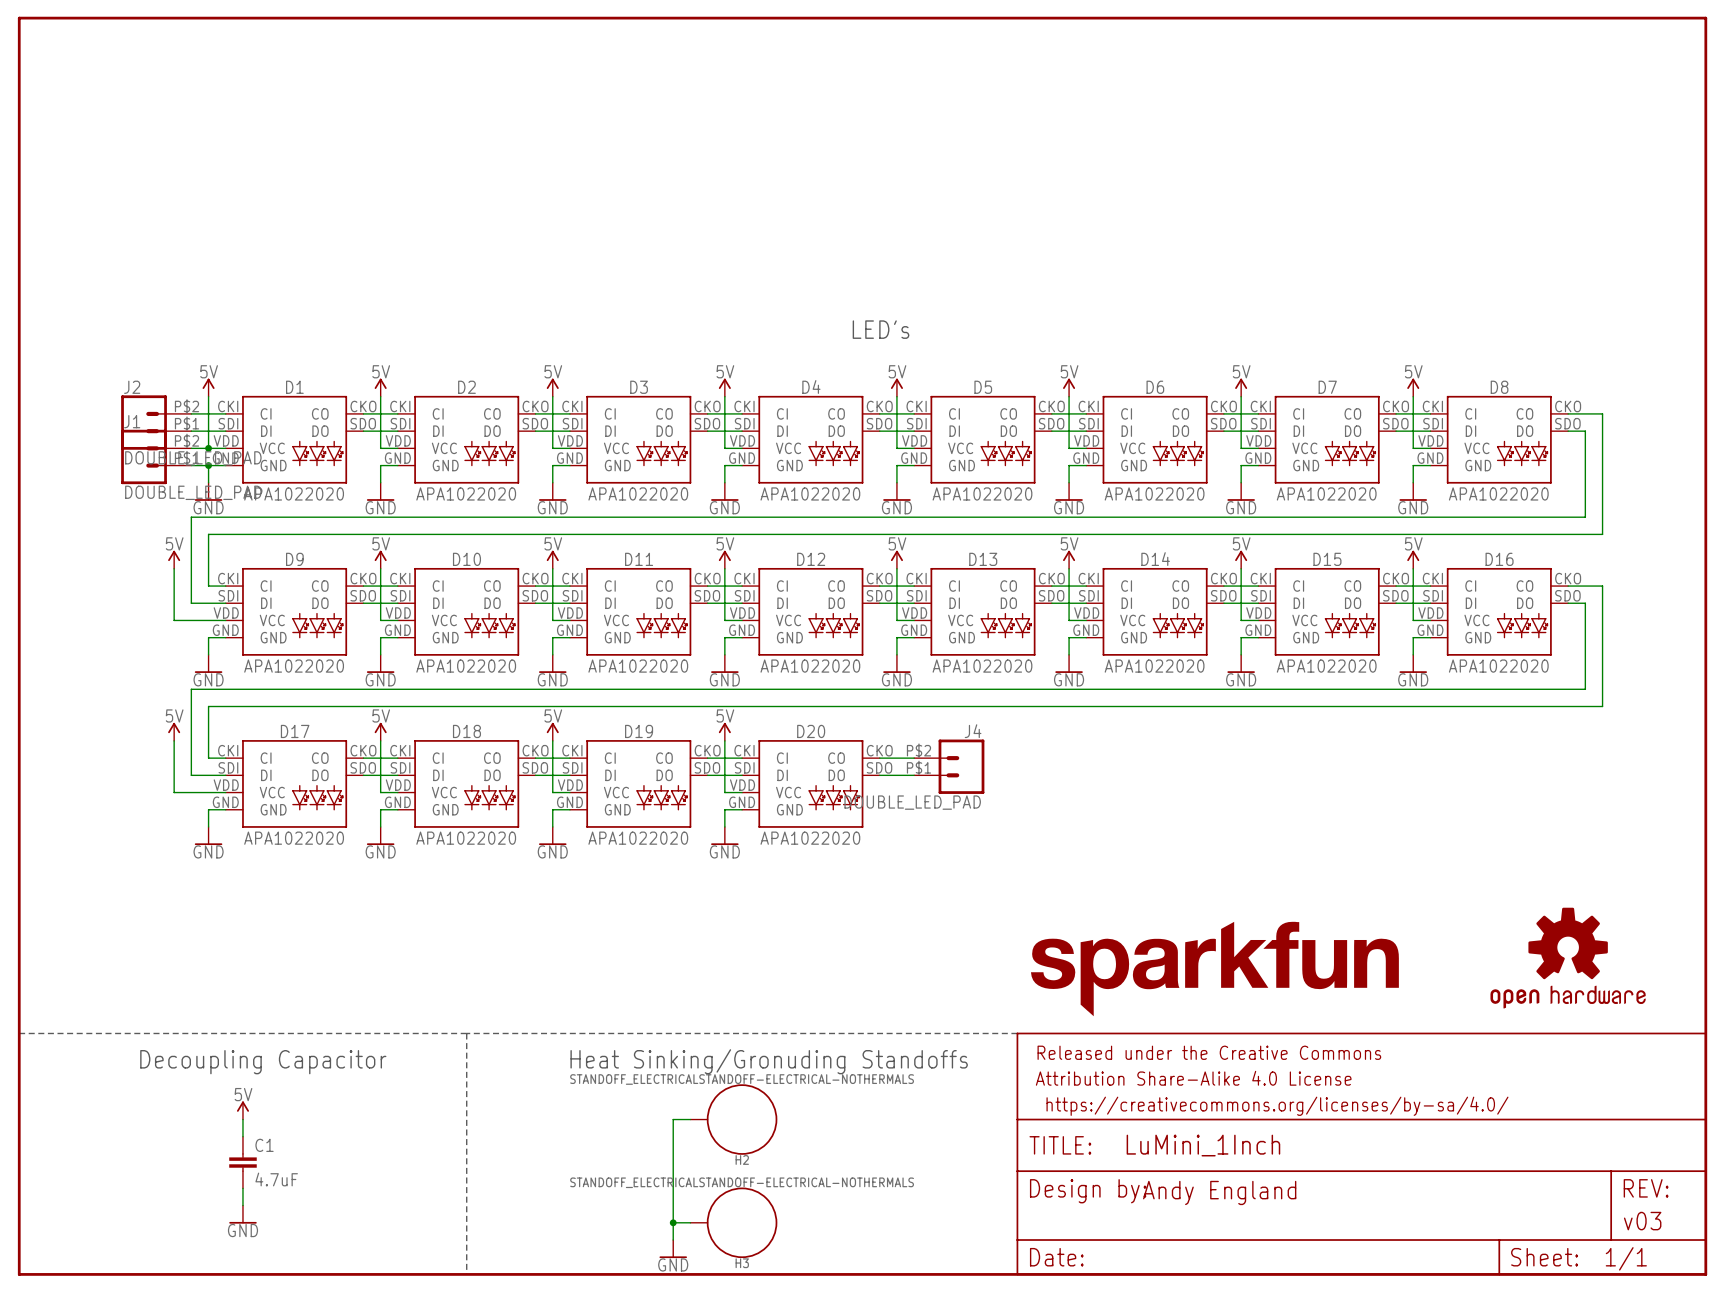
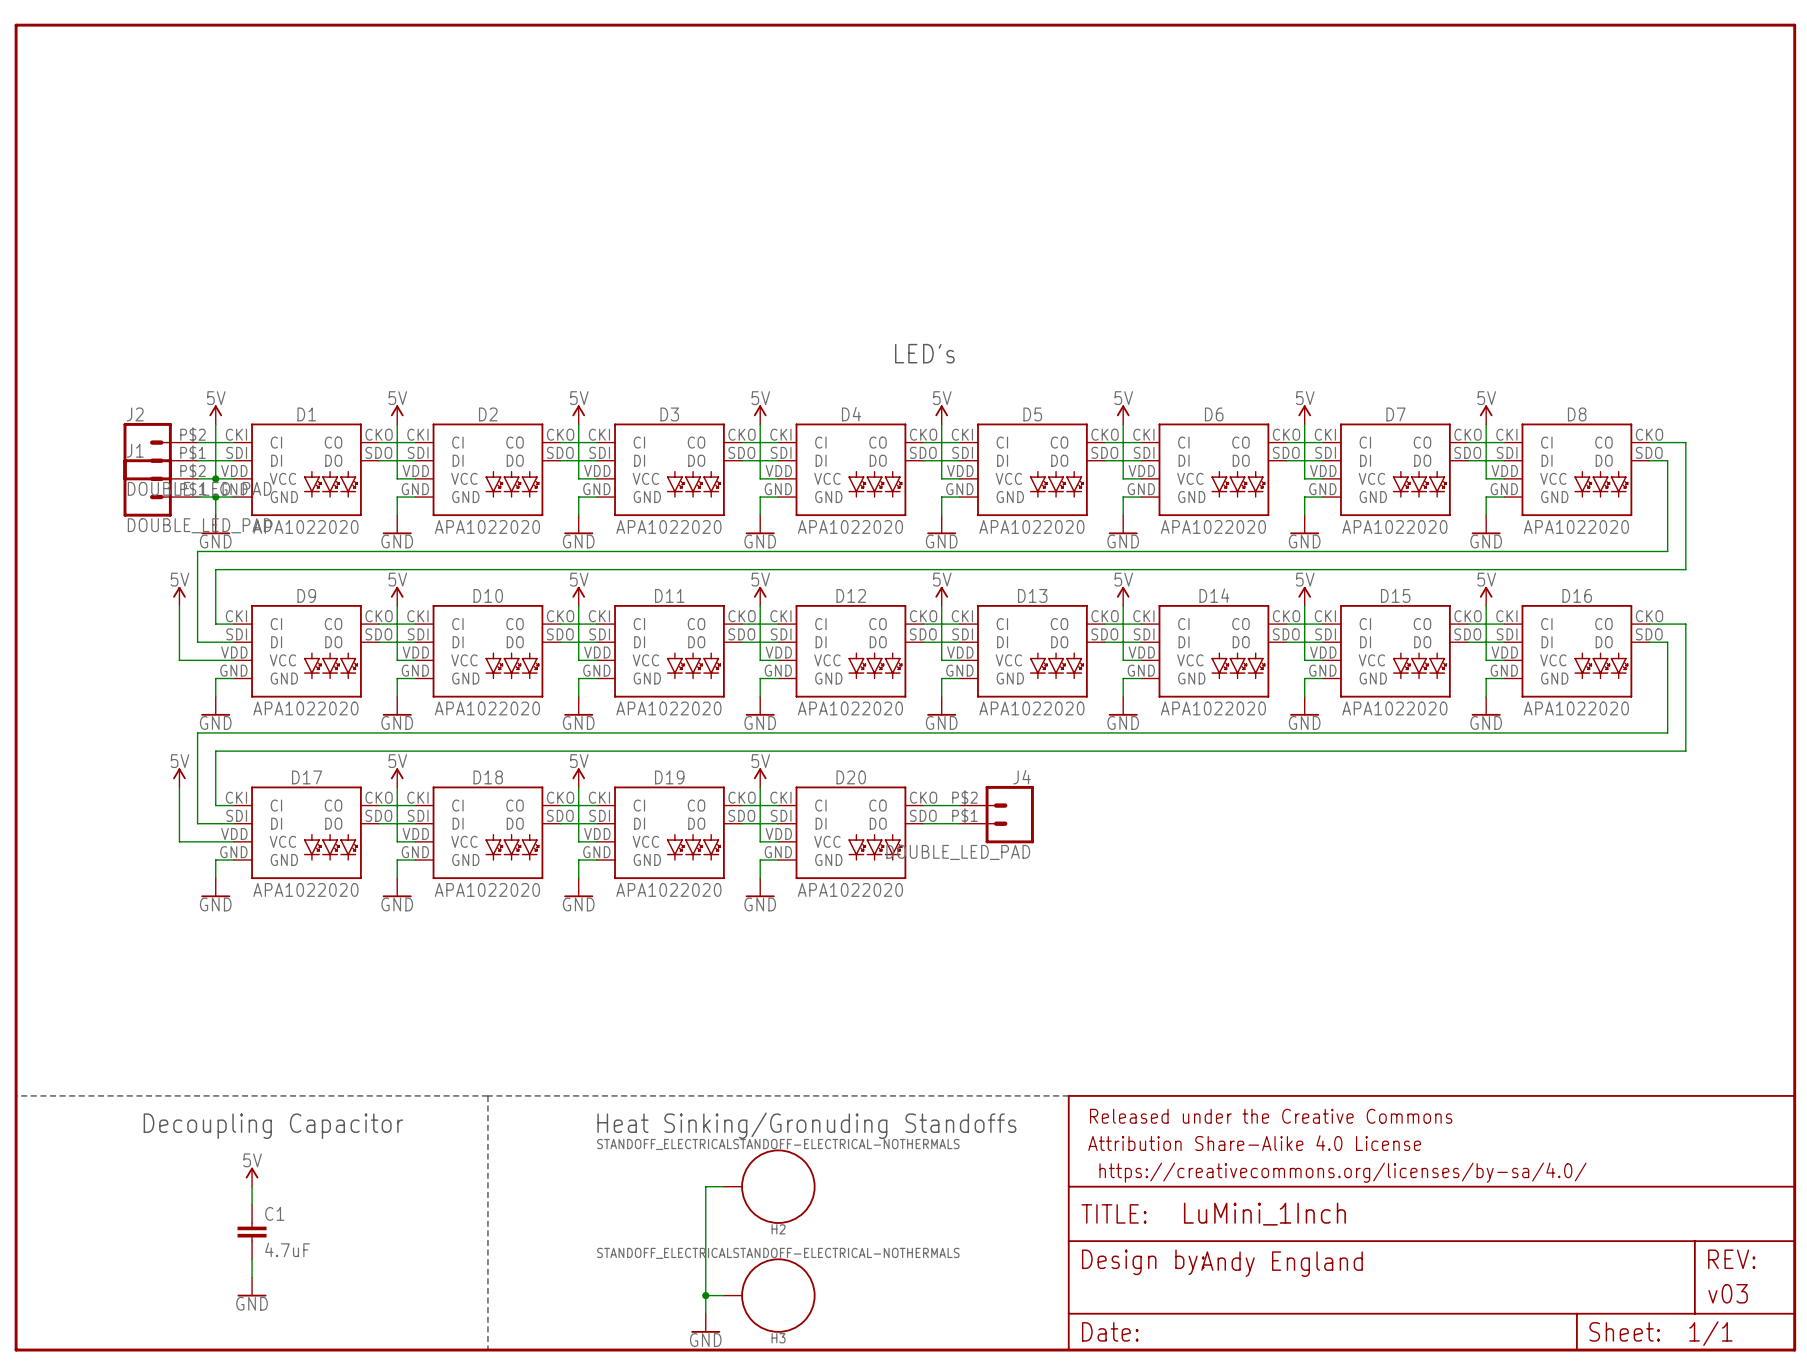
part: (1568, 958) -> none
part: (1214, 969) -> none

